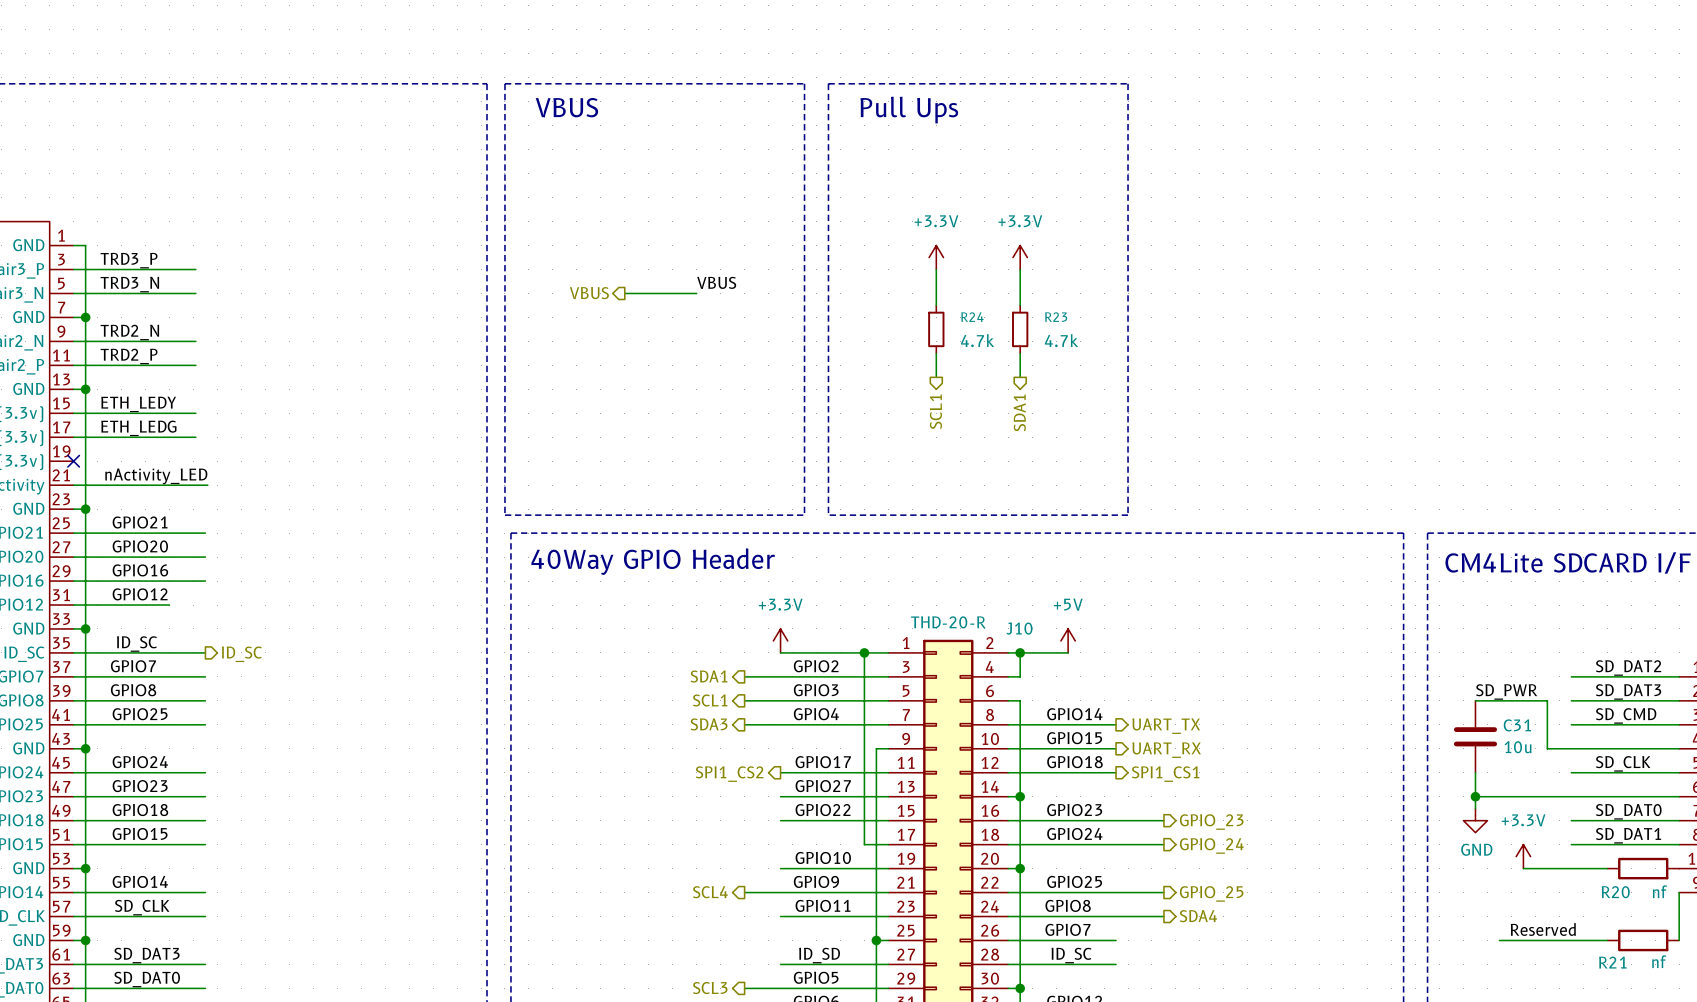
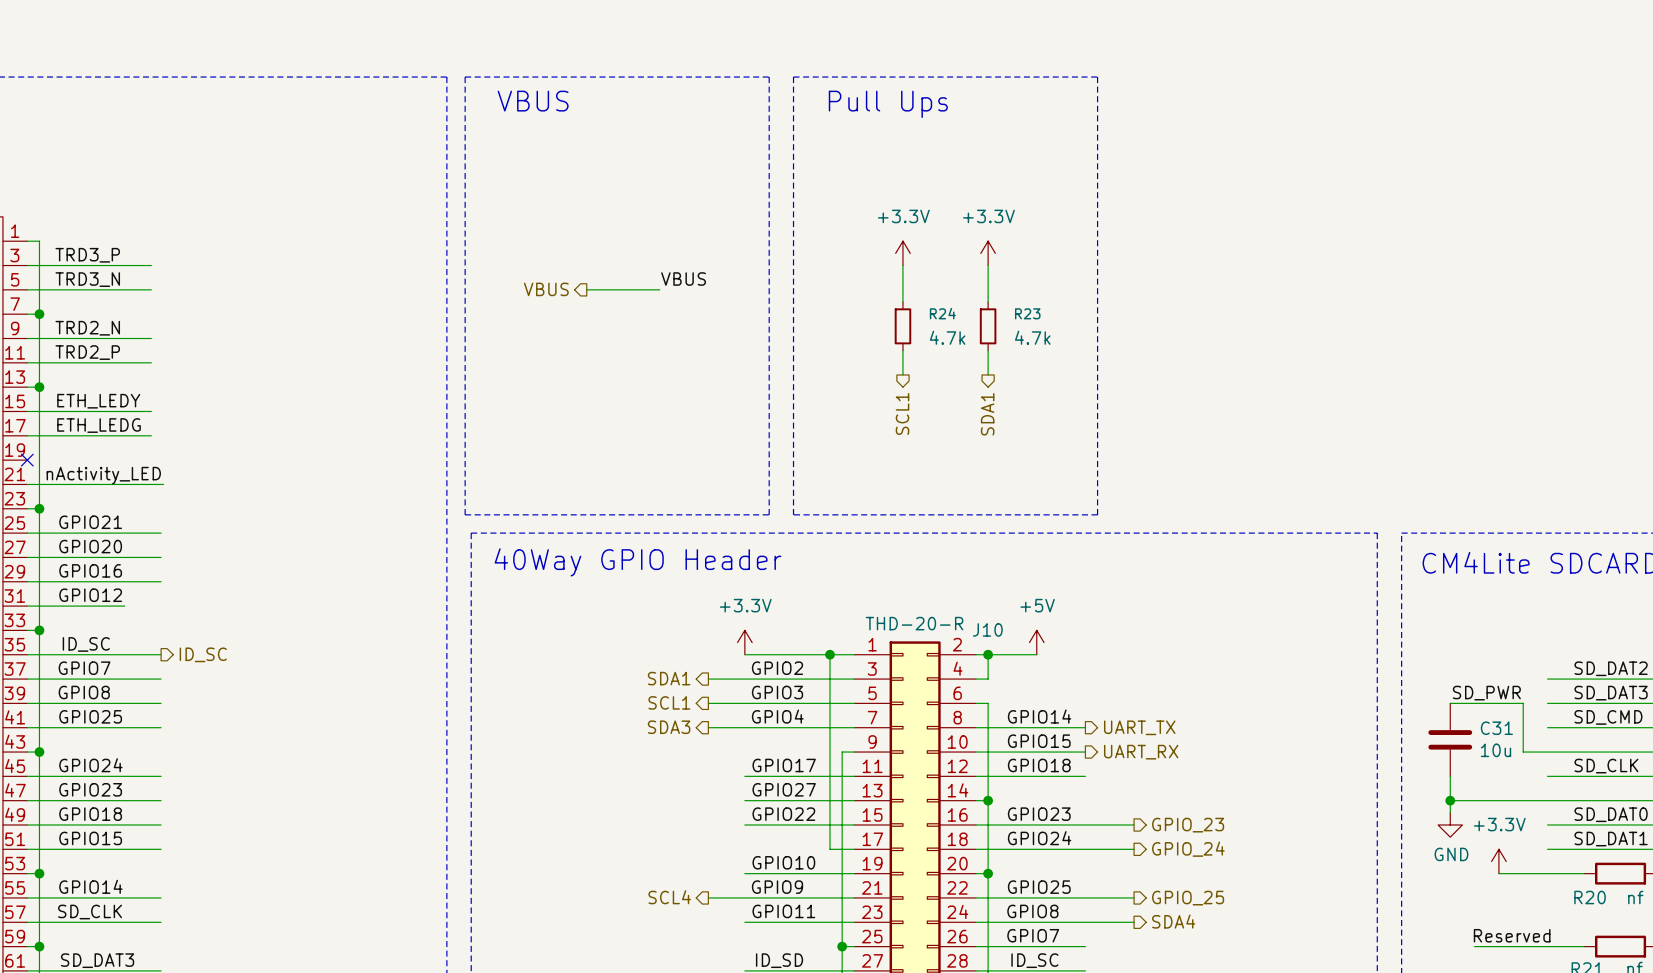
hierarchical label: SPI1_CS2 (729, 774) -> none
hierarchical label: SPI1_CS1 (1165, 774) -> none

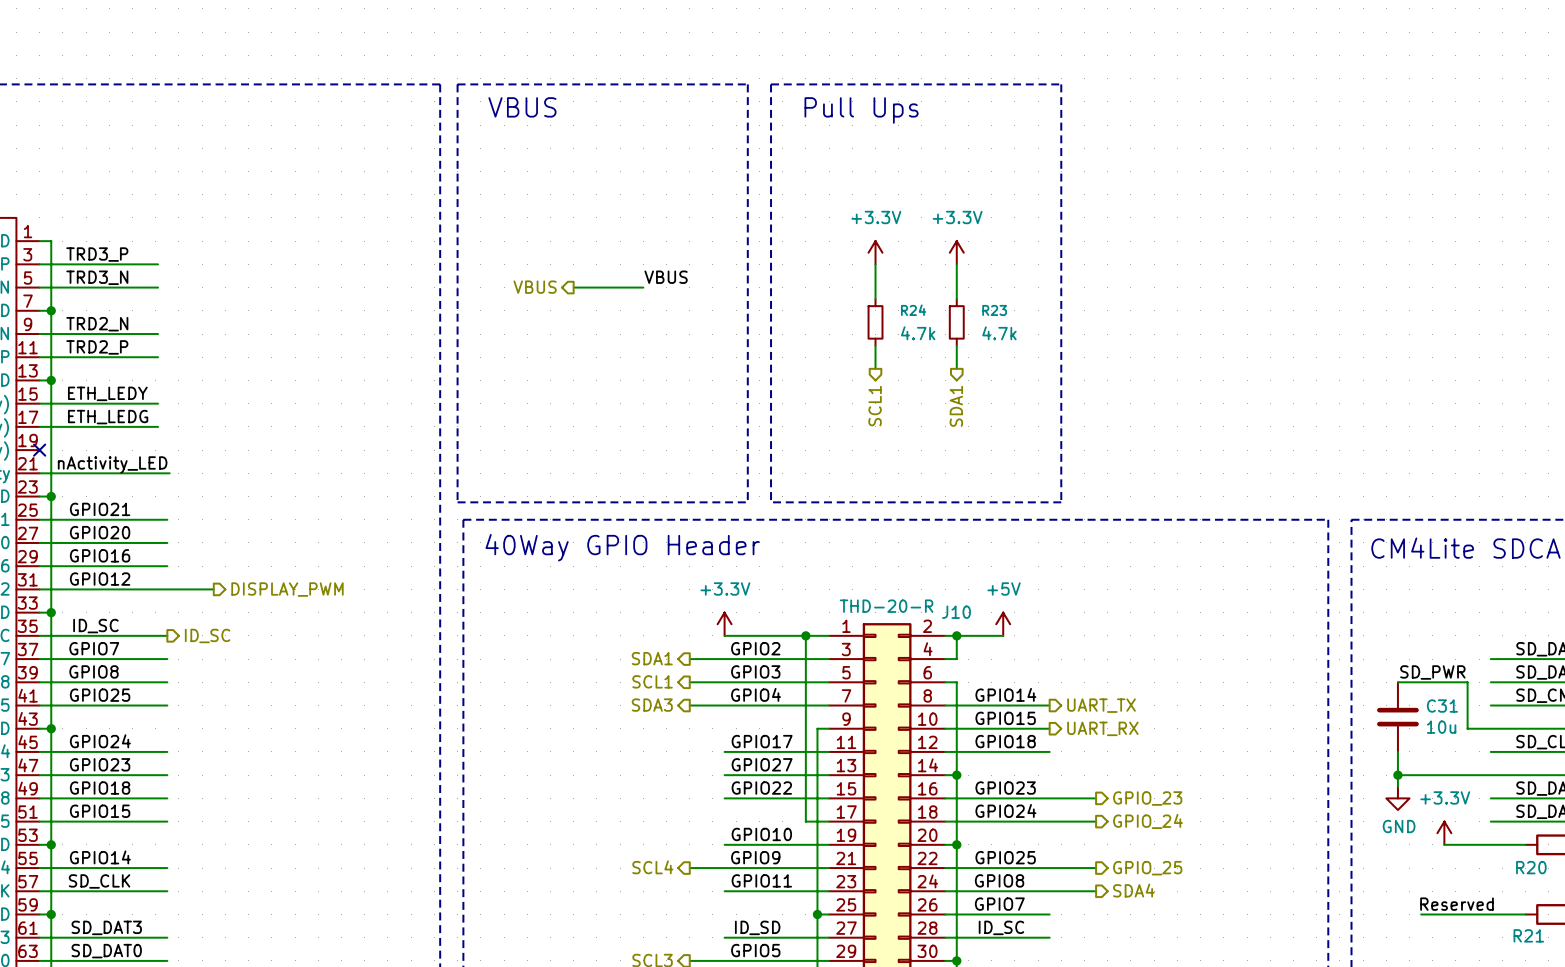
wire: none -> (132, 589) (213, 589)
hierarchical label: none -> DISPLAY_PWM (287, 589)

